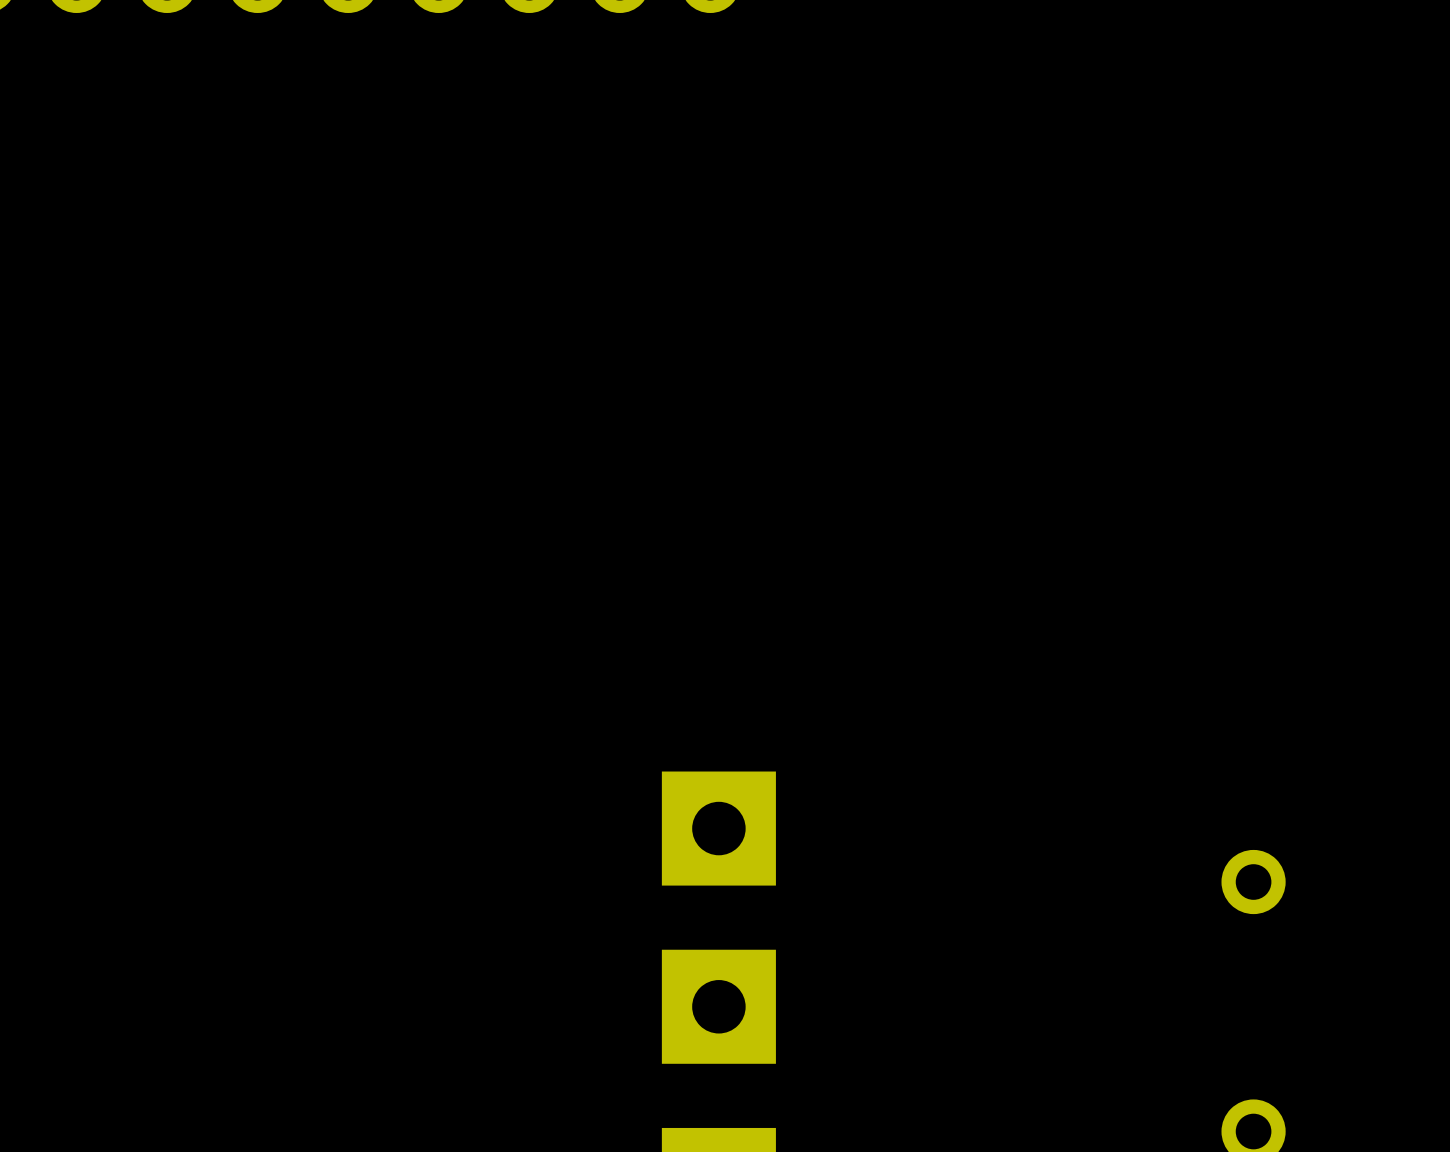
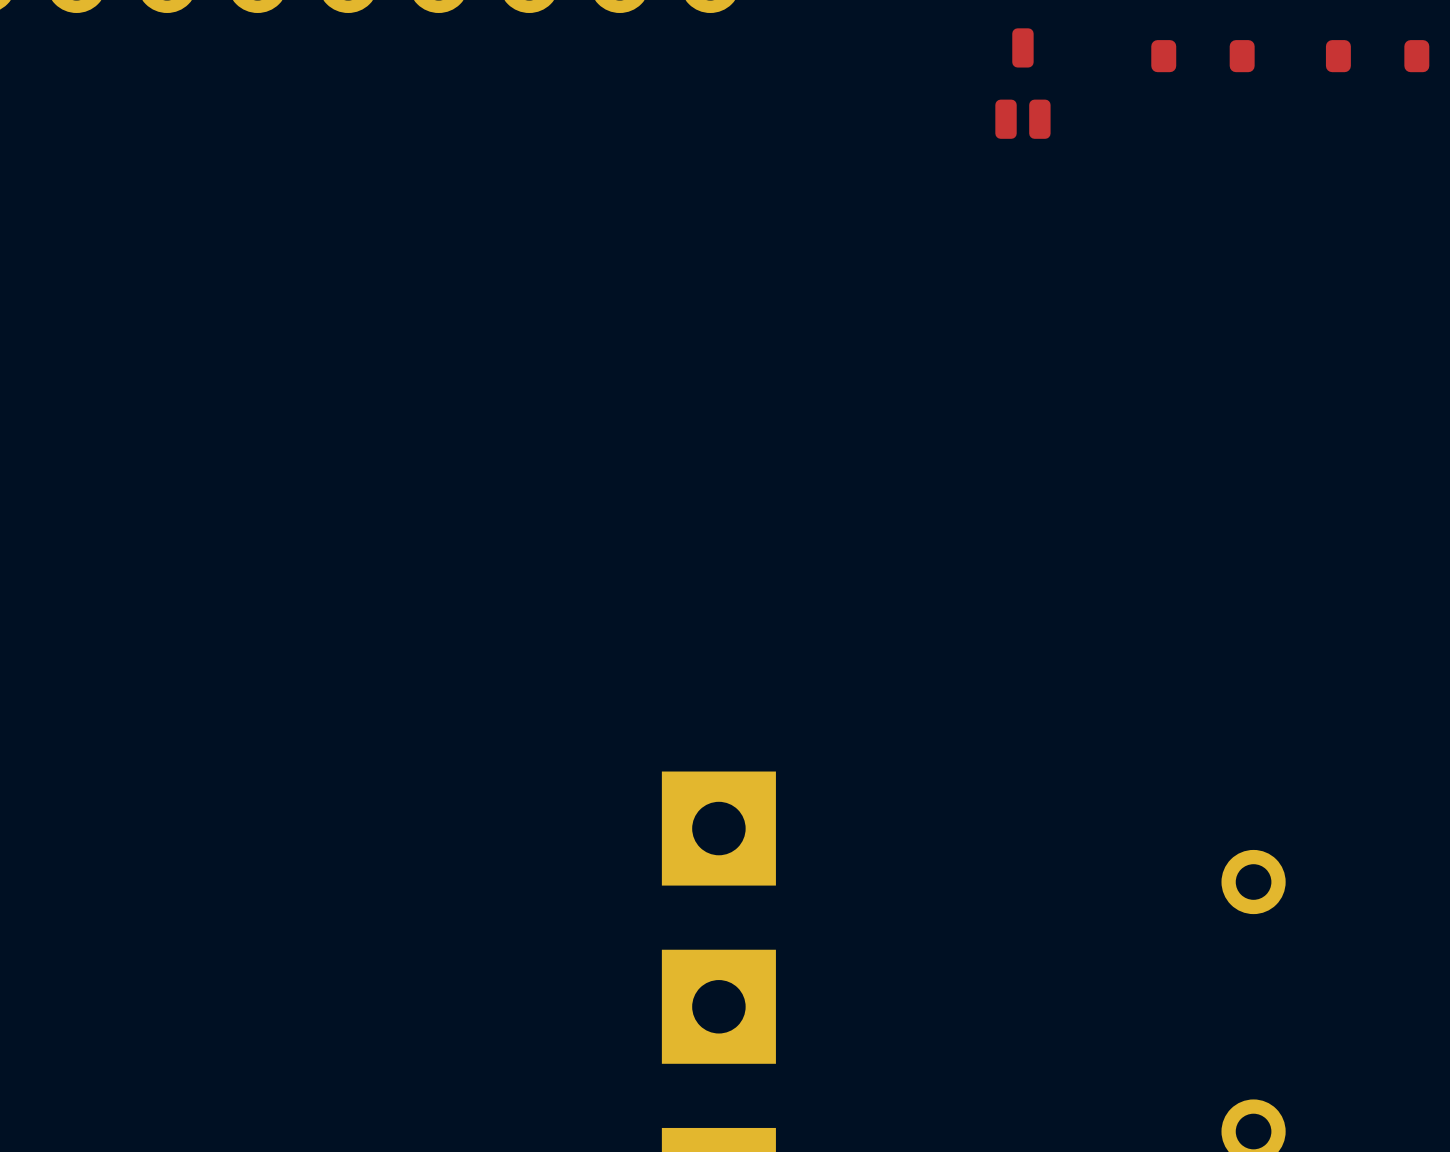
part: none -> (1202, 56)
part: none -> (1377, 56)
part: none -> (1022, 83)

